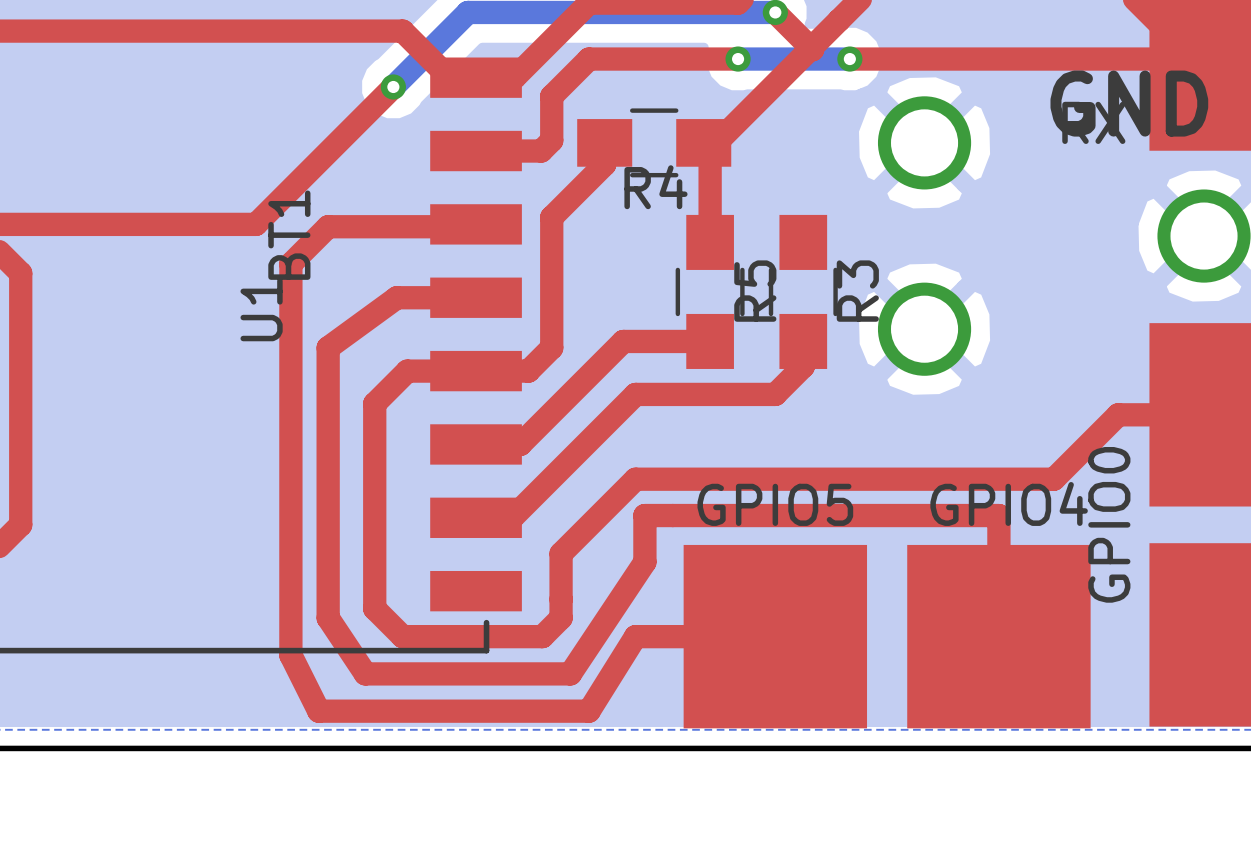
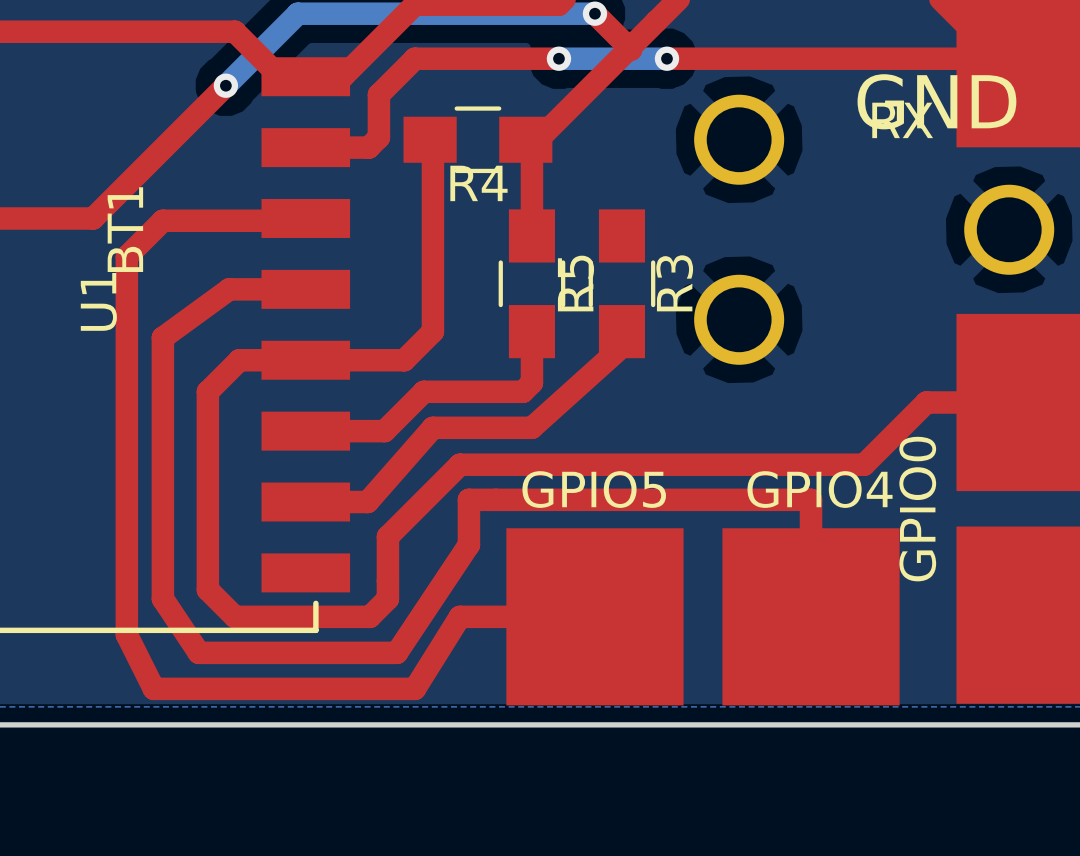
top track: (604, 142) (604, 164) (551, 217) (551, 347) (528, 371) -> (430, 139) (432, 142) (432, 331) (404, 360) (356, 360)
top track: (710, 341) (623, 341) (520, 444) -> (531, 331) (531, 382) (522, 391) (423, 391) (384, 431) (348, 431)
top track: (803, 357) (803, 366) (775, 394) (635, 394) (512, 517) -> (621, 346) (531, 427) (432, 427) (367, 502) (340, 502)

